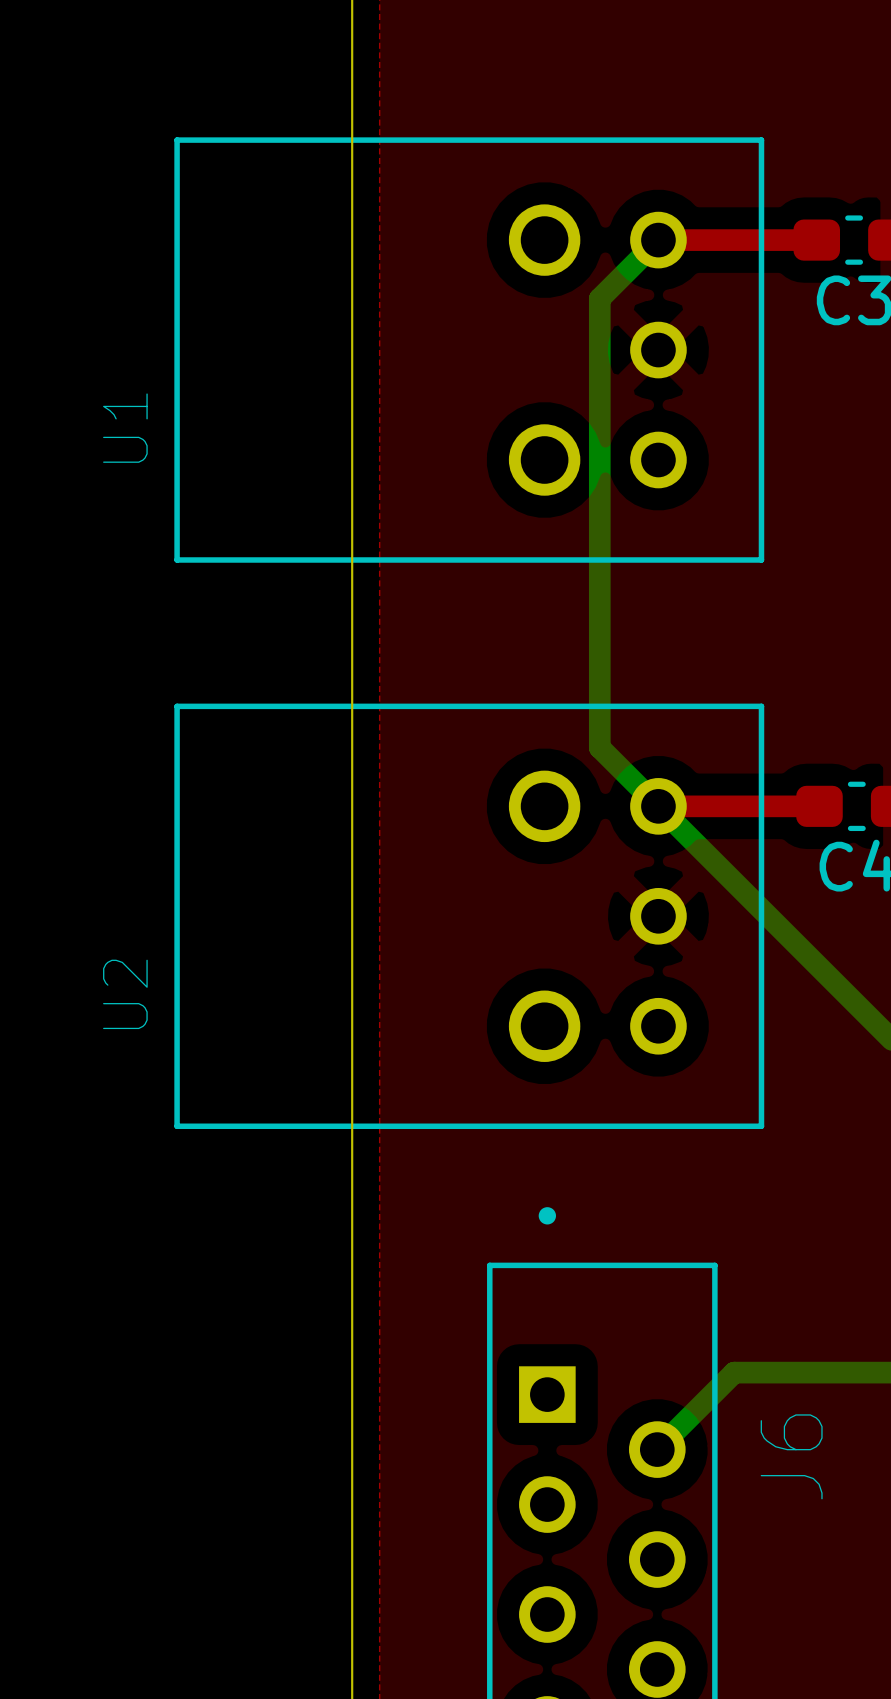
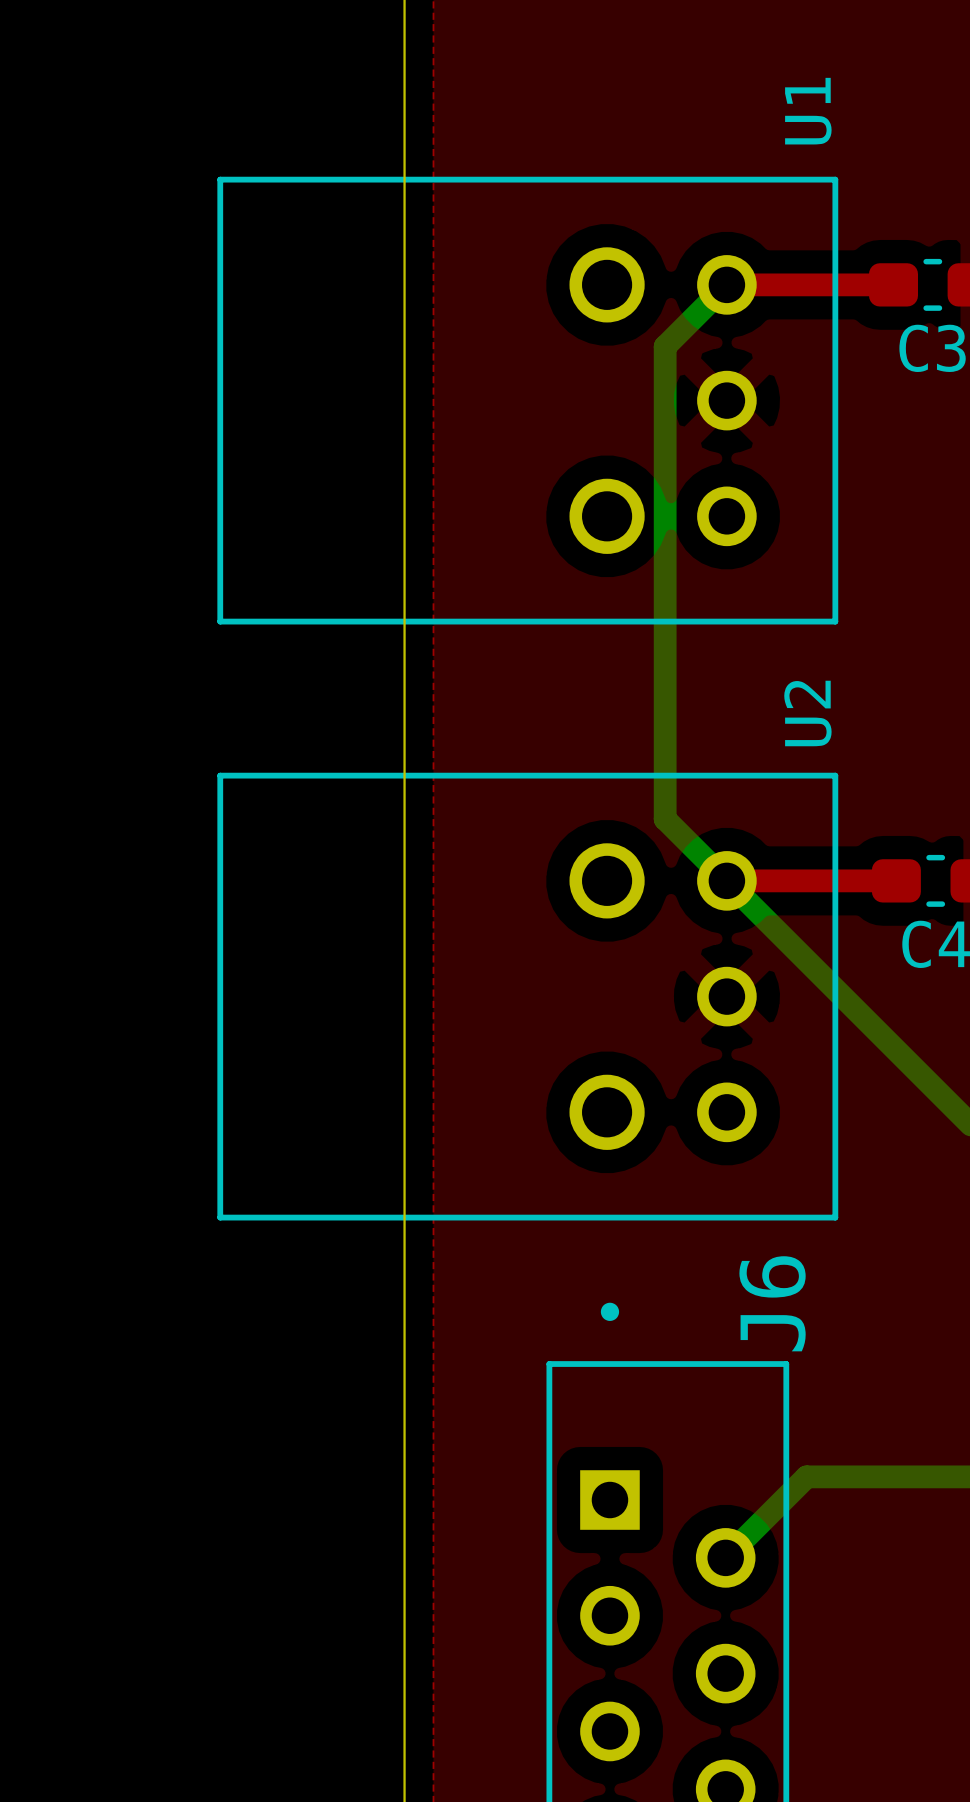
U1 name position: U1 (125, 428) -> U1 (808, 111)
U2 name position: U2 (125, 994) -> U2 (807, 713)
J6 name position: J6 (791, 1456) -> J6 (772, 1303)

